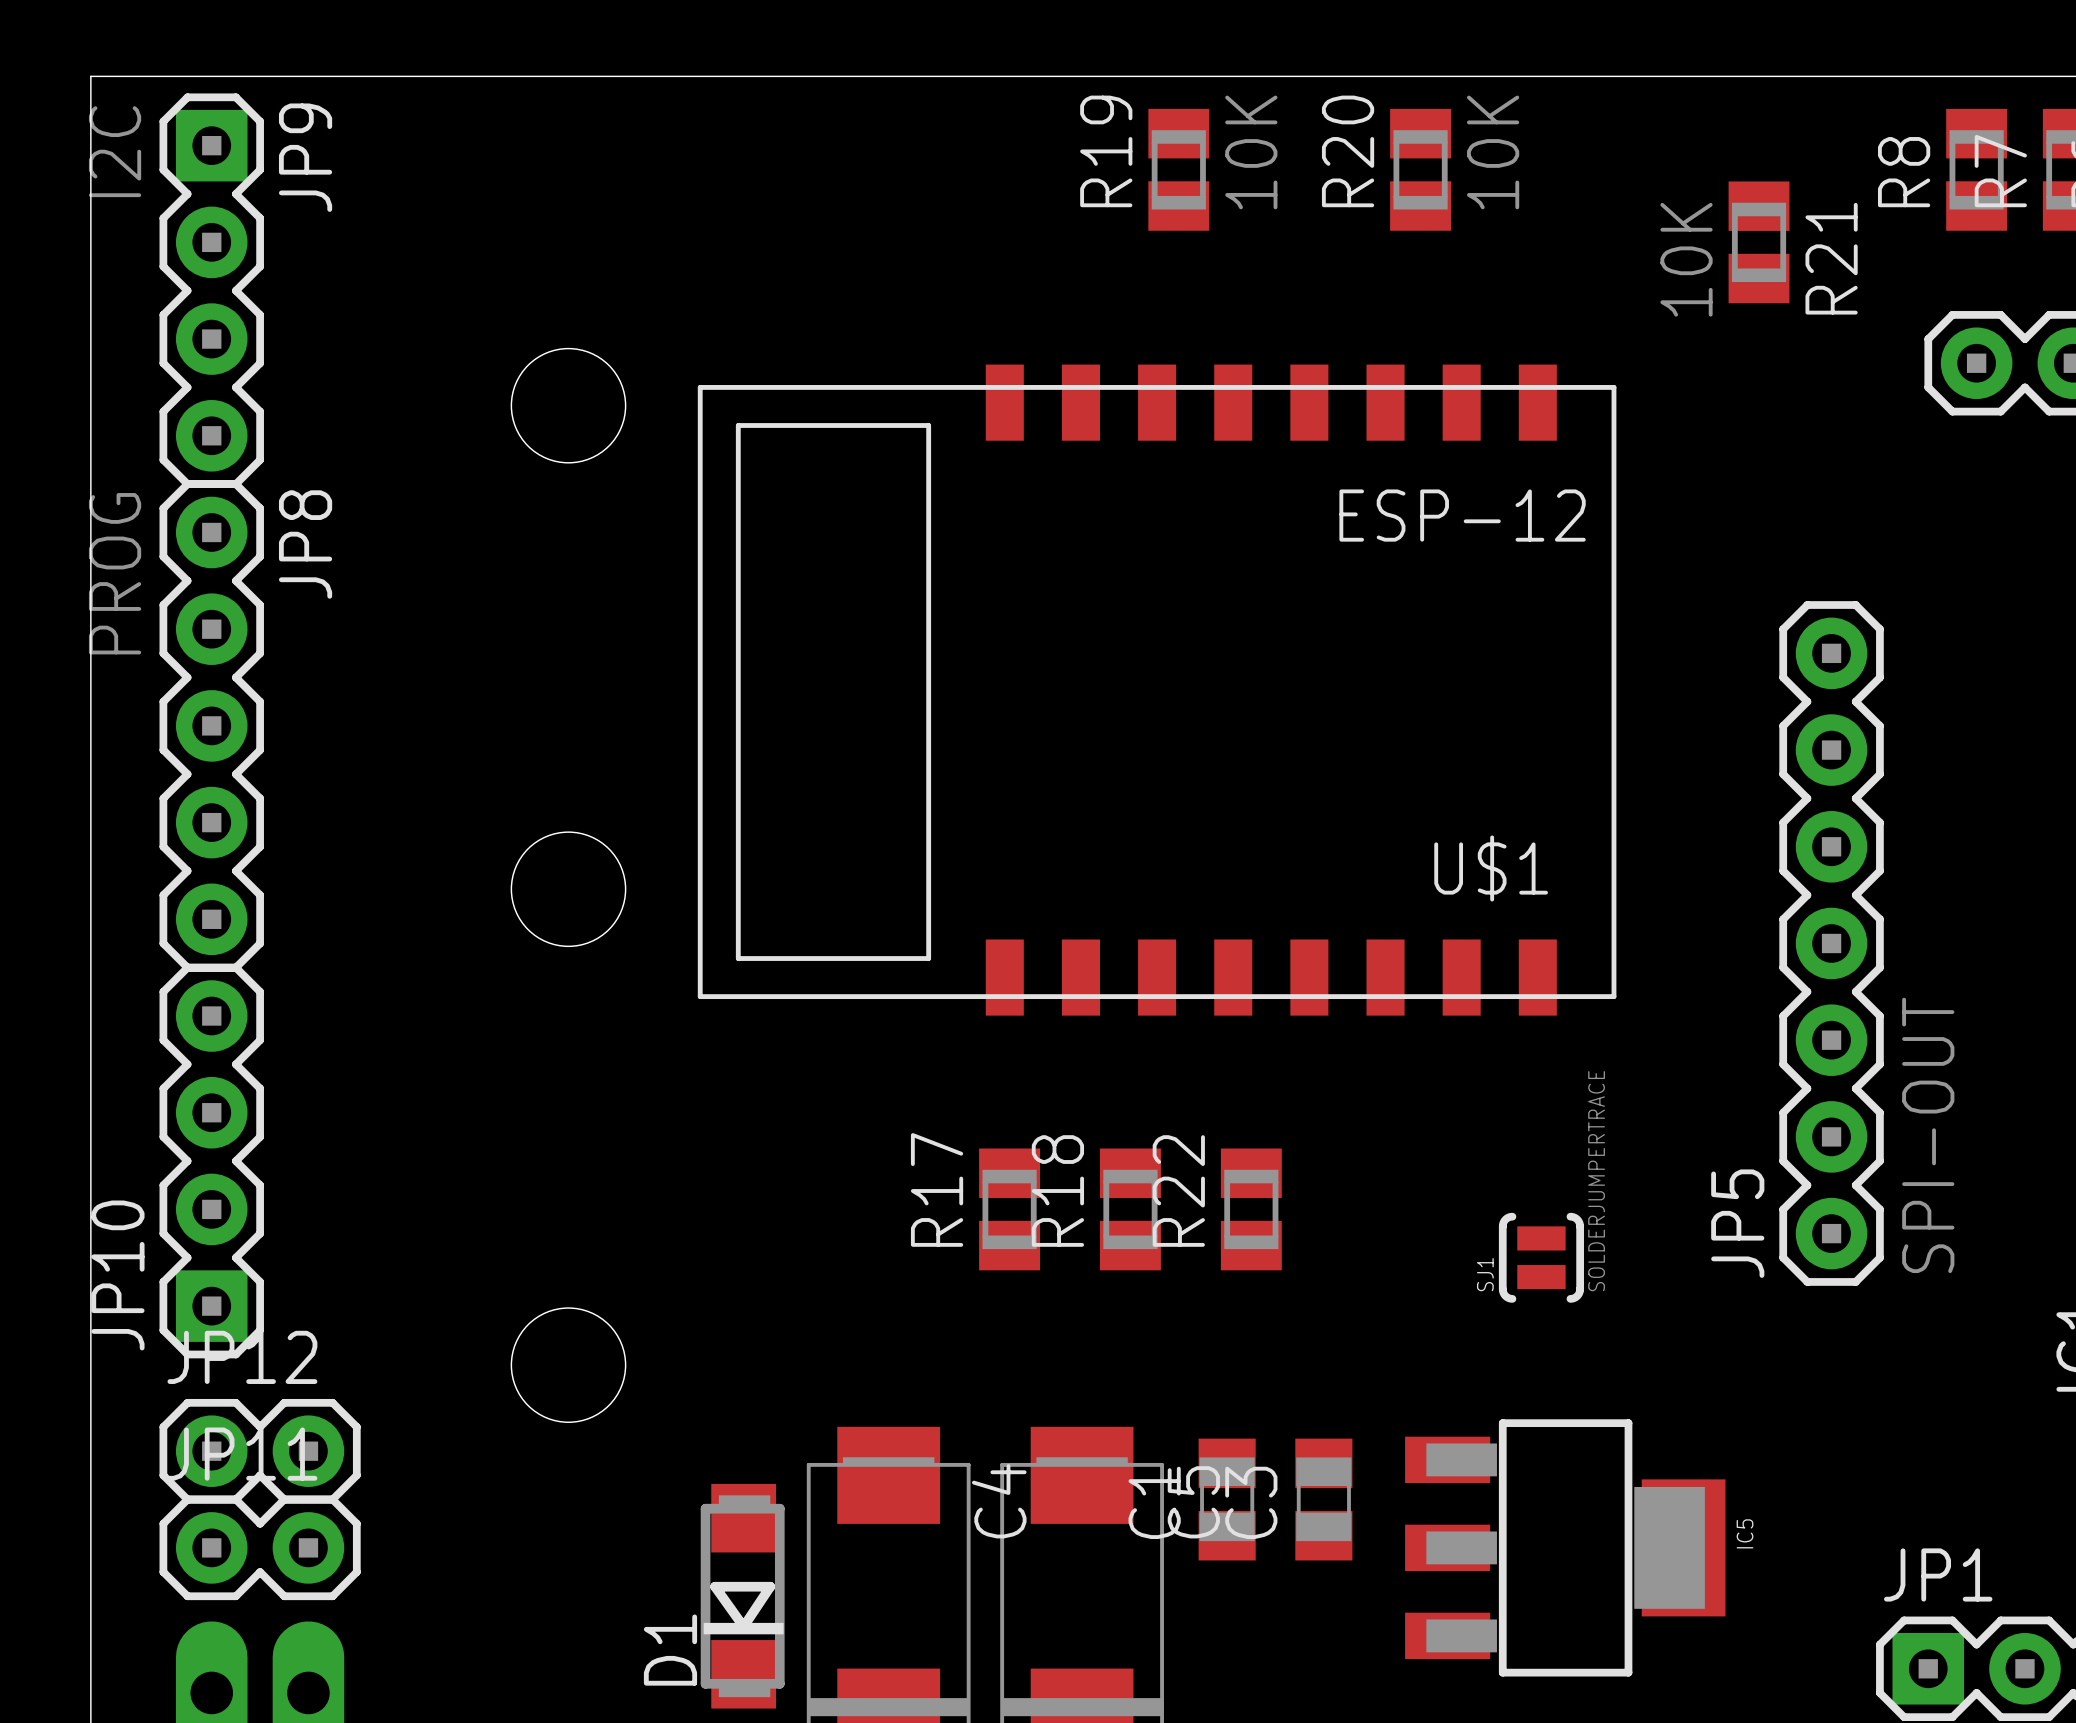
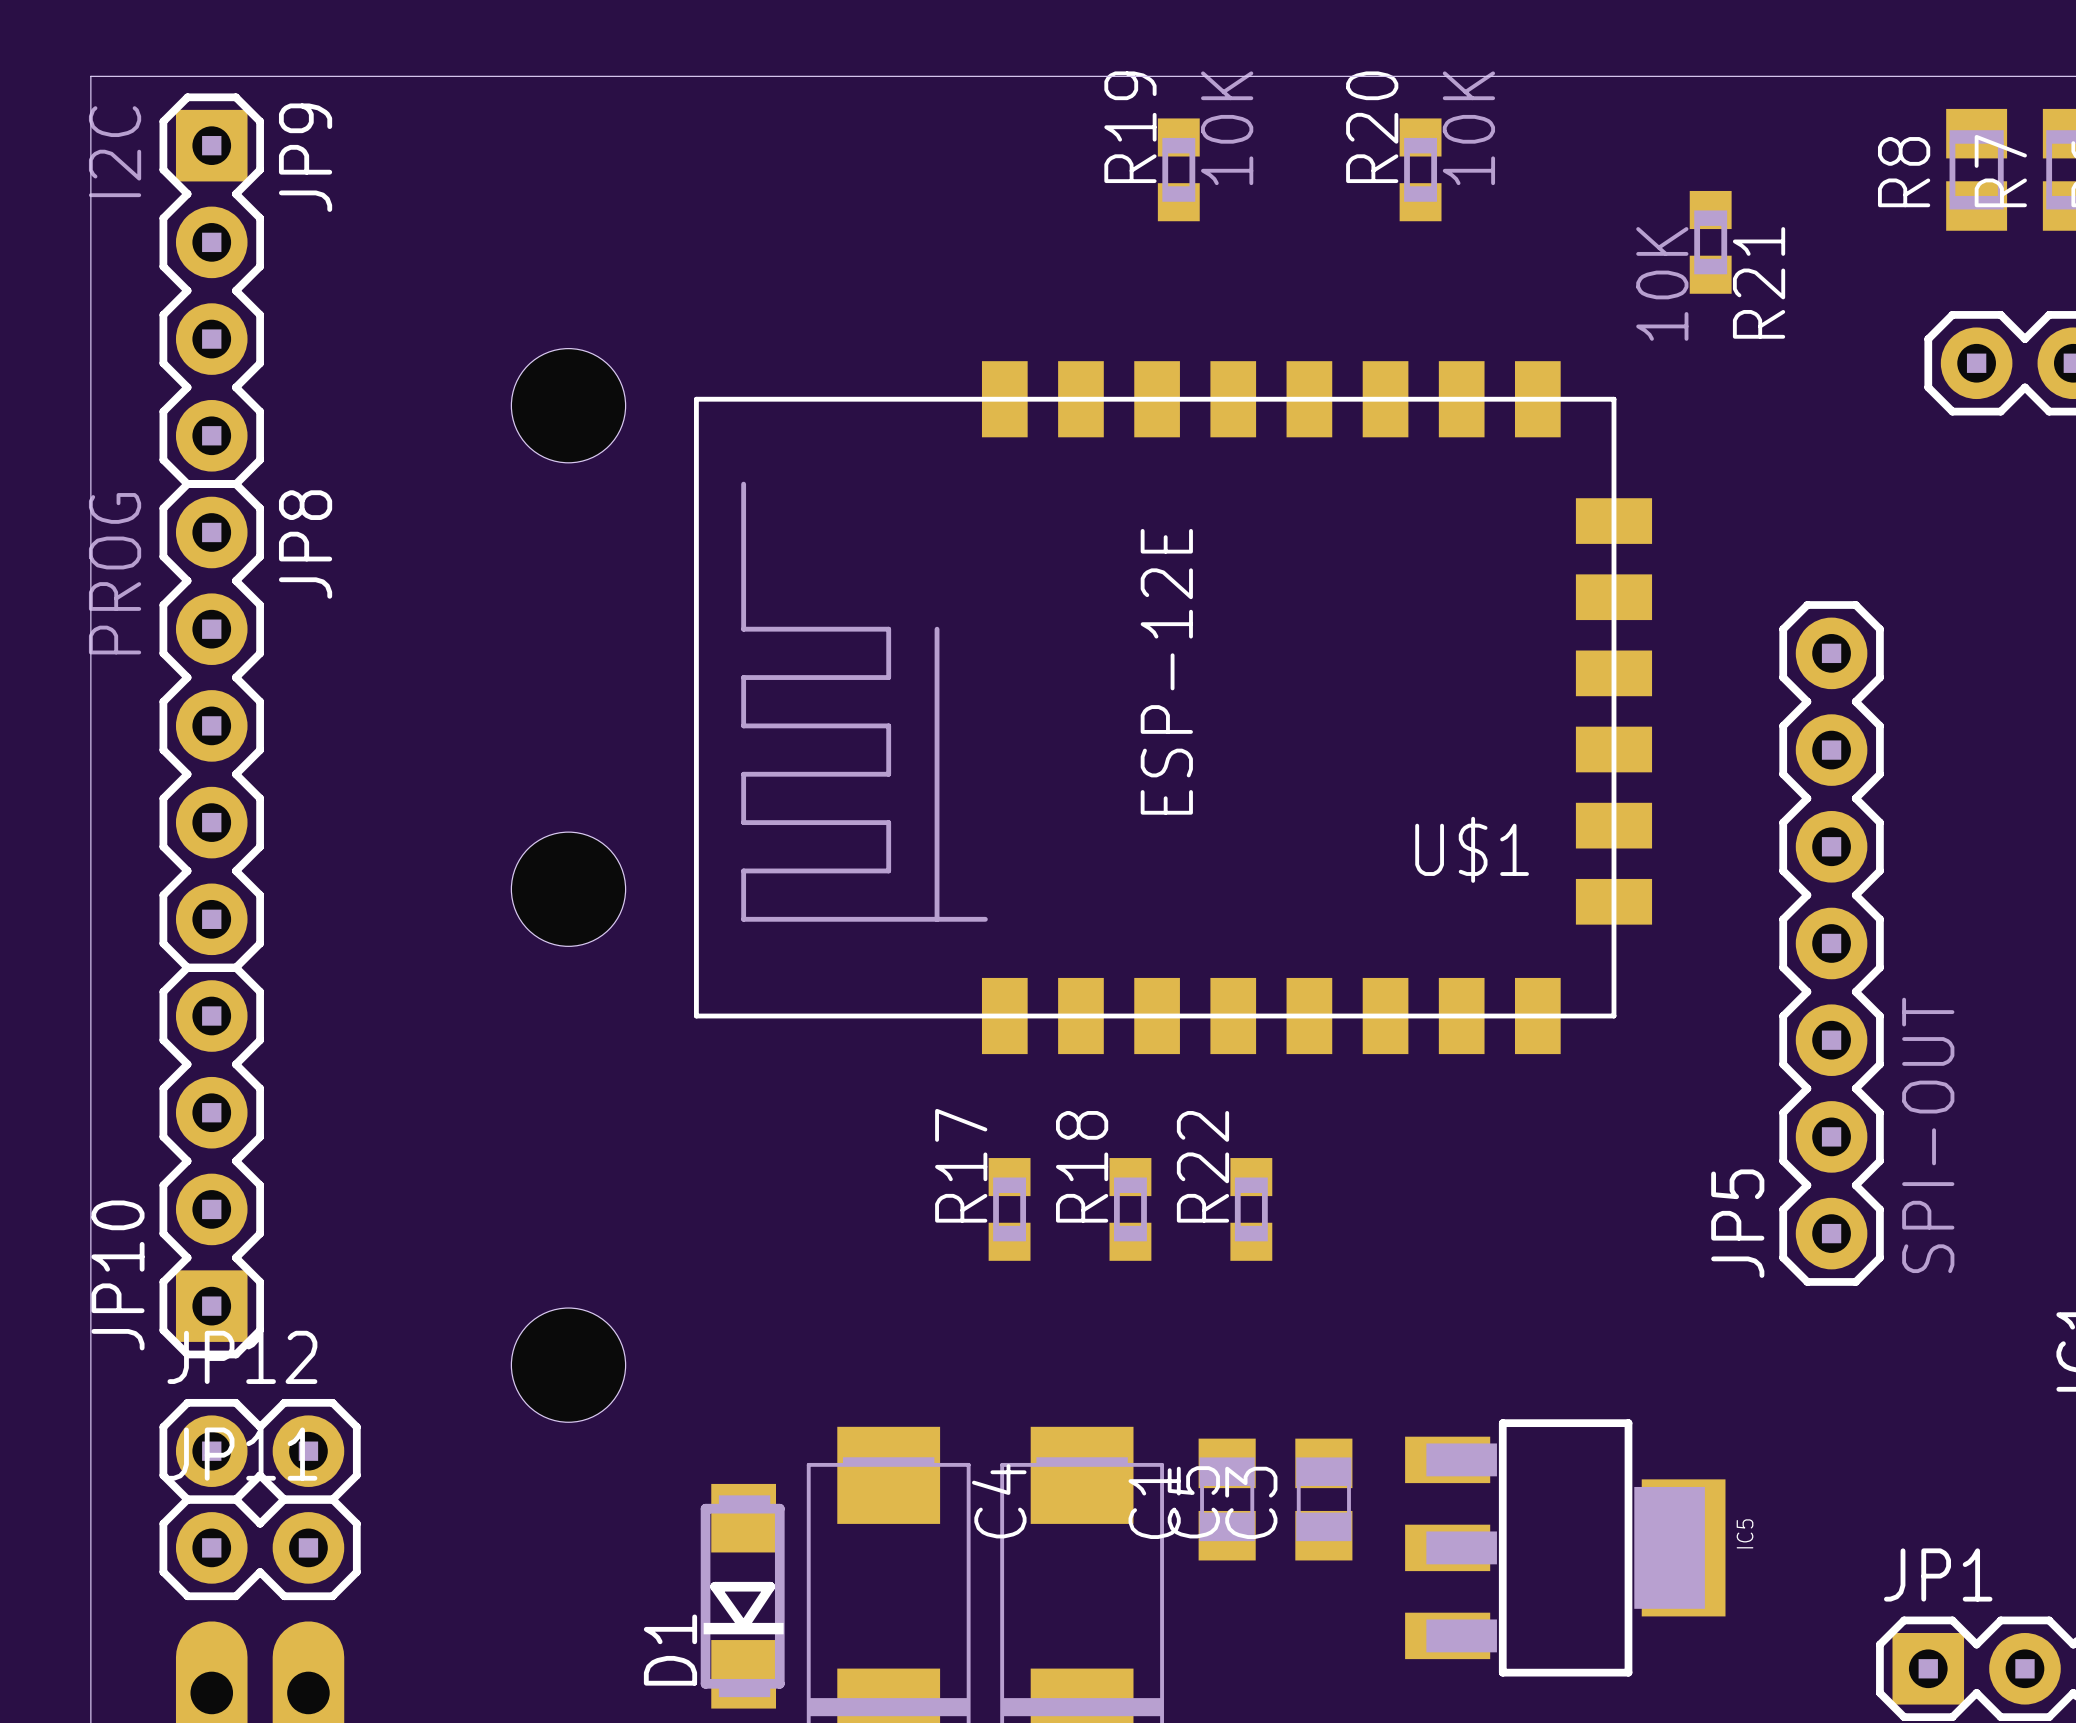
R19 footprint: [1148, 108, 1210, 231] -> [1157, 118, 1200, 222]
R20 footprint: [1390, 108, 1452, 231] -> [1399, 118, 1442, 222]
R19 name position: R19 (1106, 151) -> R19 (1130, 127)
R20 name position: R20 (1348, 151) -> R20 (1372, 127)
R19 value position: 10K (1251, 152) -> 10K (1227, 128)
R20 value position: 10K (1493, 152) -> 10K (1468, 128)
R21 footprint: [1728, 181, 1790, 304] -> [1689, 190, 1732, 294]
U$1 footprint: [697, 364, 1617, 1016] -> [694, 361, 1653, 1055]
R17 footprint: [979, 1148, 1041, 1271] -> [988, 1158, 1031, 1261]
R18 footprint: [1099, 1148, 1161, 1271] -> [1109, 1158, 1152, 1261]
R22 footprint: [1220, 1148, 1282, 1271] -> [1230, 1158, 1273, 1261]
R17 name position: R17 (937, 1189) -> R17 (961, 1165)
R18 name position: R18 (1057, 1190) -> R18 (1082, 1166)
R22 name position: R22 (1178, 1190) -> R22 (1202, 1166)
SJ1: SOLDERJUMPERTRACE (1541, 1257) -> none

